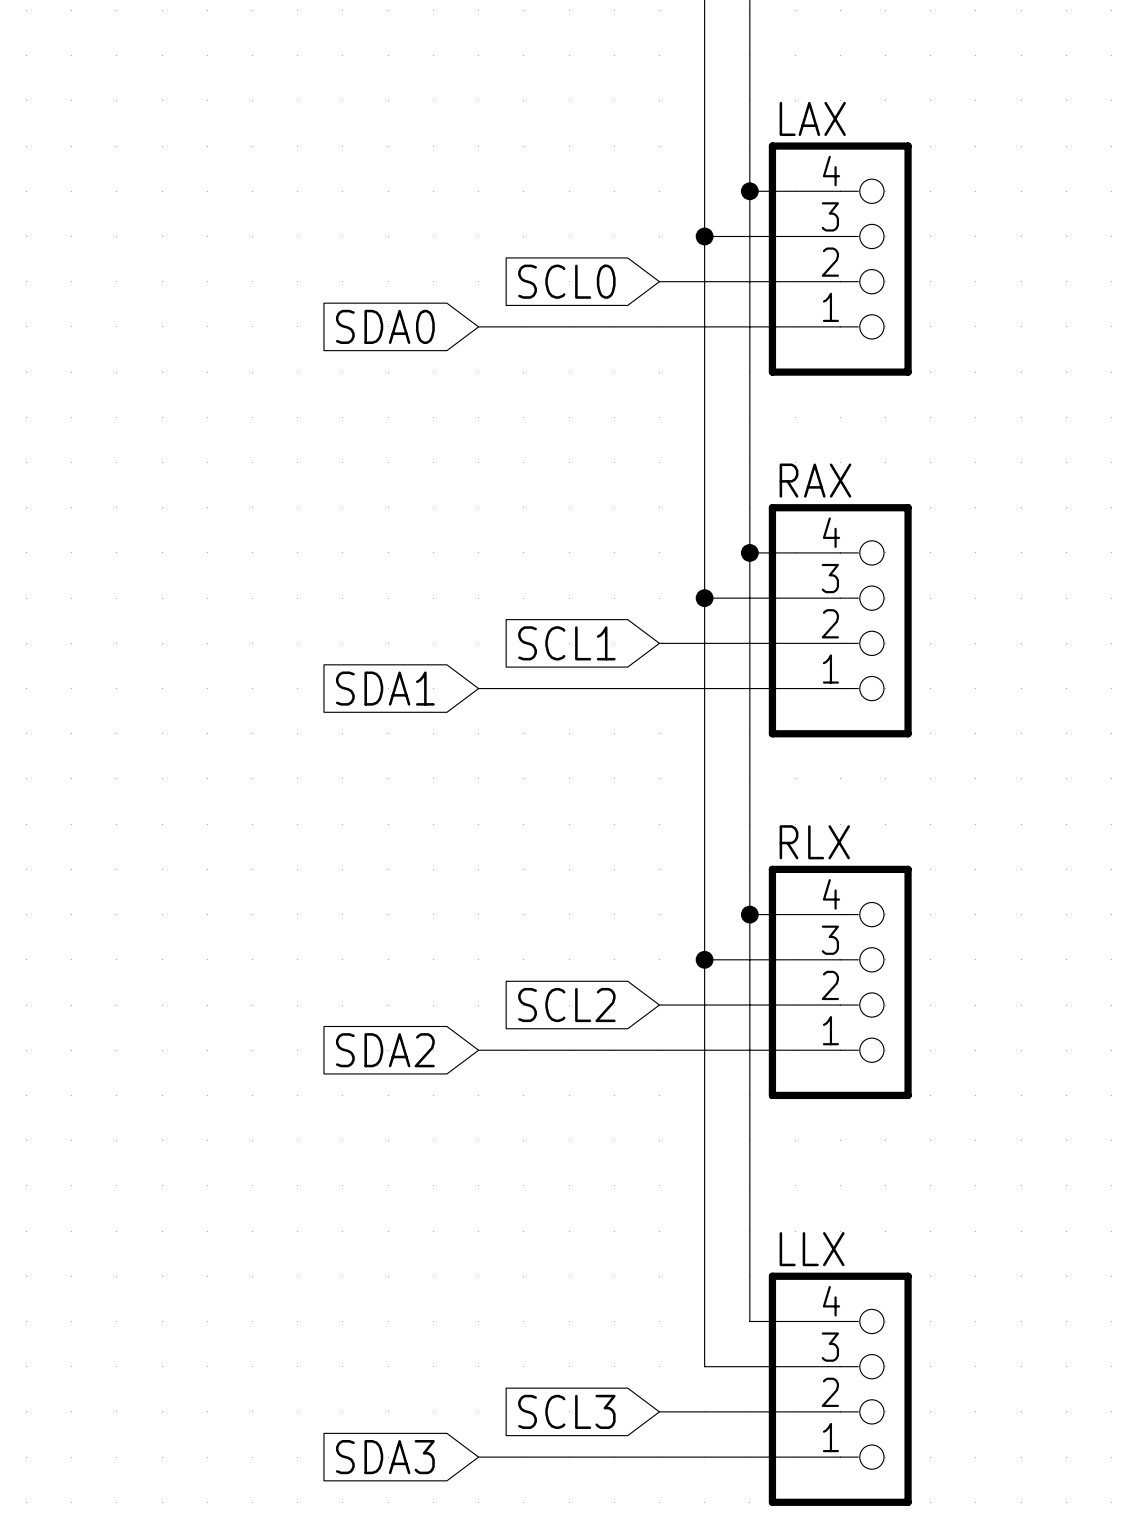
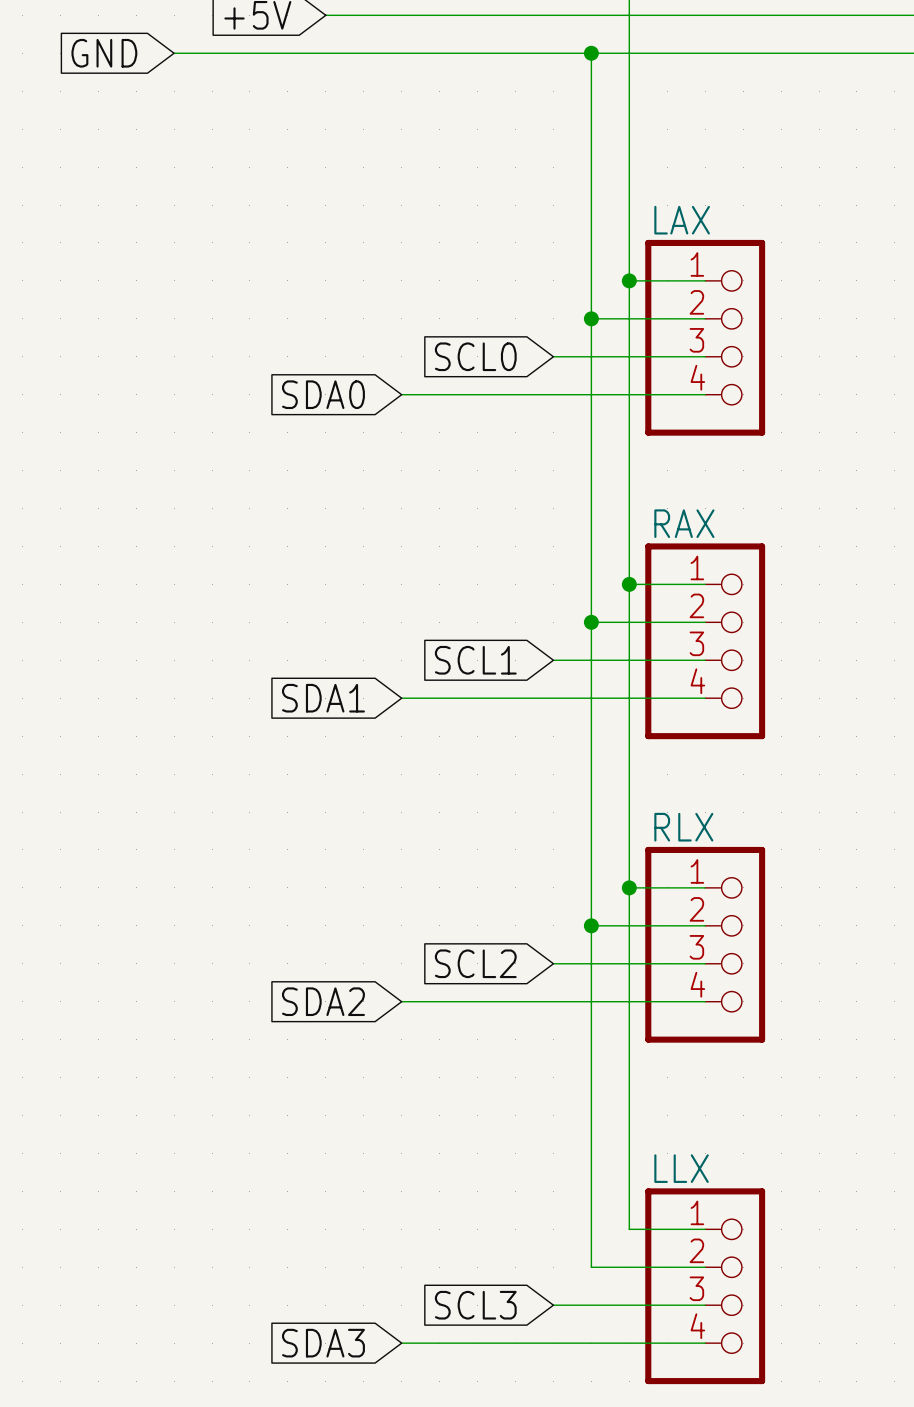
LAX flip: as is (840, 259) -> up-down (705, 337)
RAX flip: as is (840, 620) -> up-down (705, 641)
RLX flip: as is (840, 982) -> up-down (705, 944)
LLX flip: as is (840, 1389) -> up-down (705, 1286)

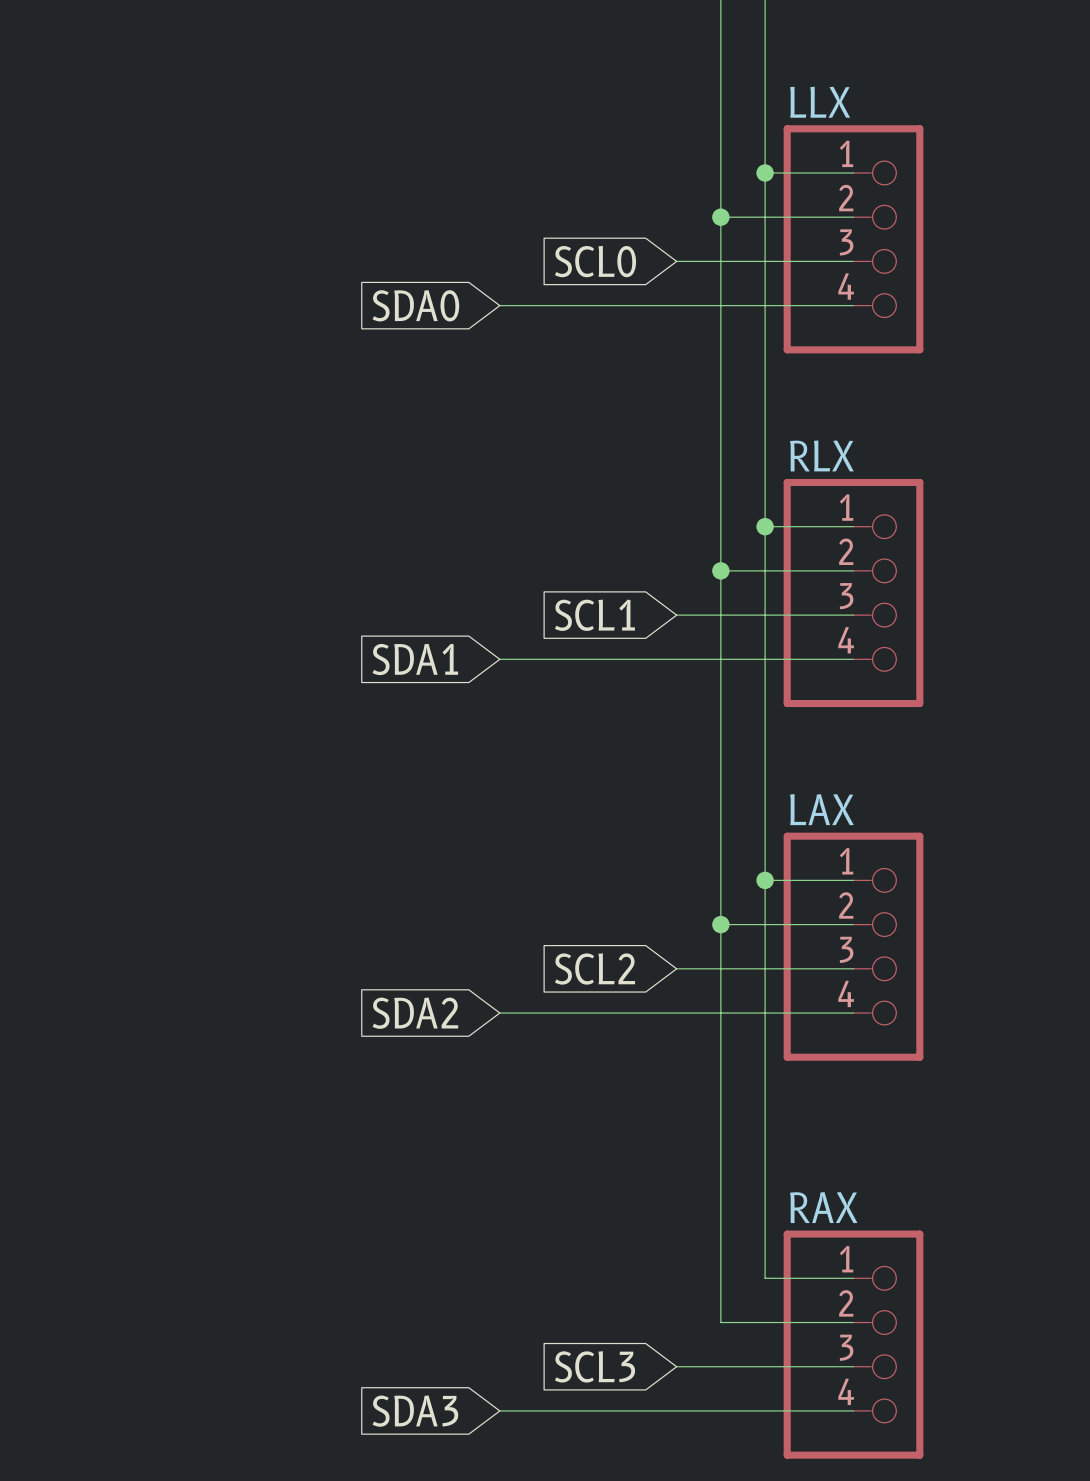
LAX name: LAX (682, 220) -> LLX (820, 102)
RAX name: RAX (684, 523) -> RLX (821, 455)
RLX name: RLX (683, 827) -> LAX (821, 809)
LLX name: LLX (681, 1168) -> RAX (823, 1207)

